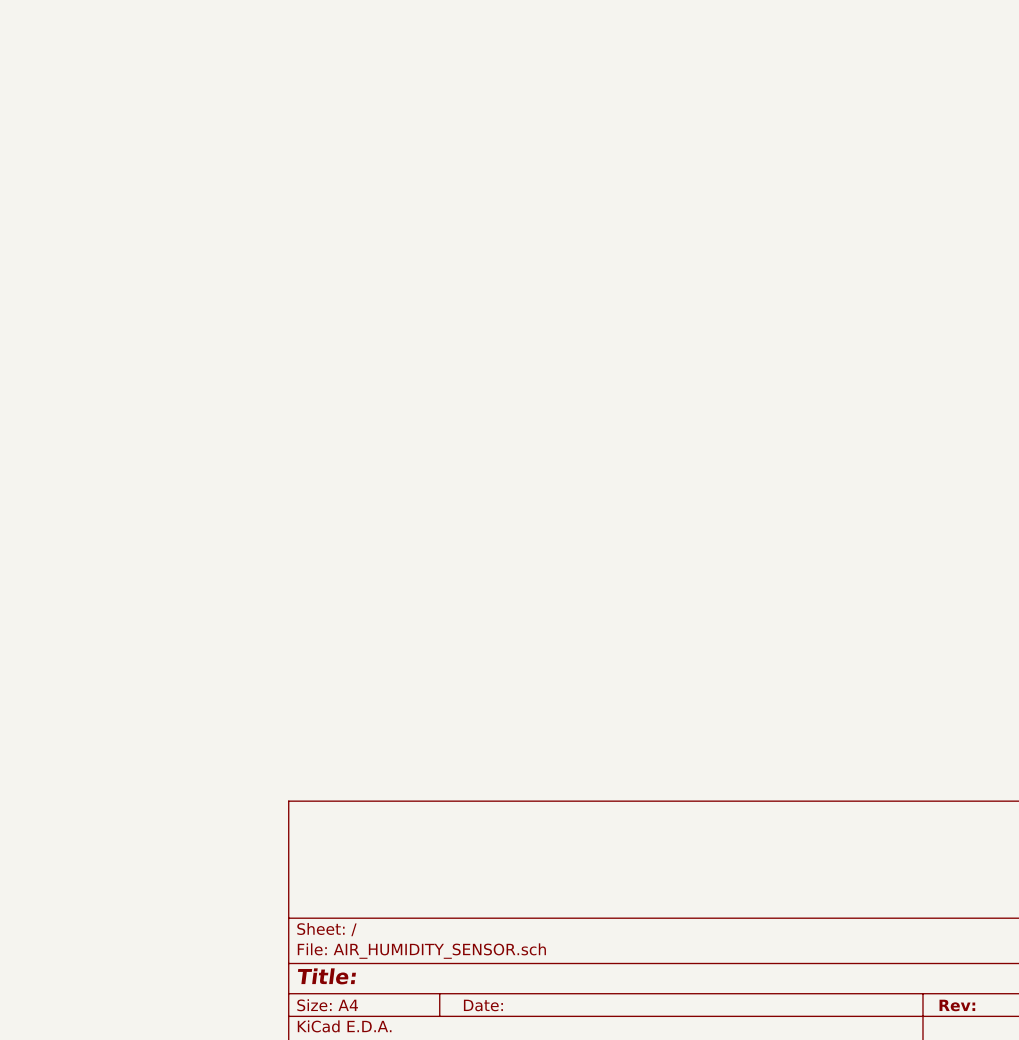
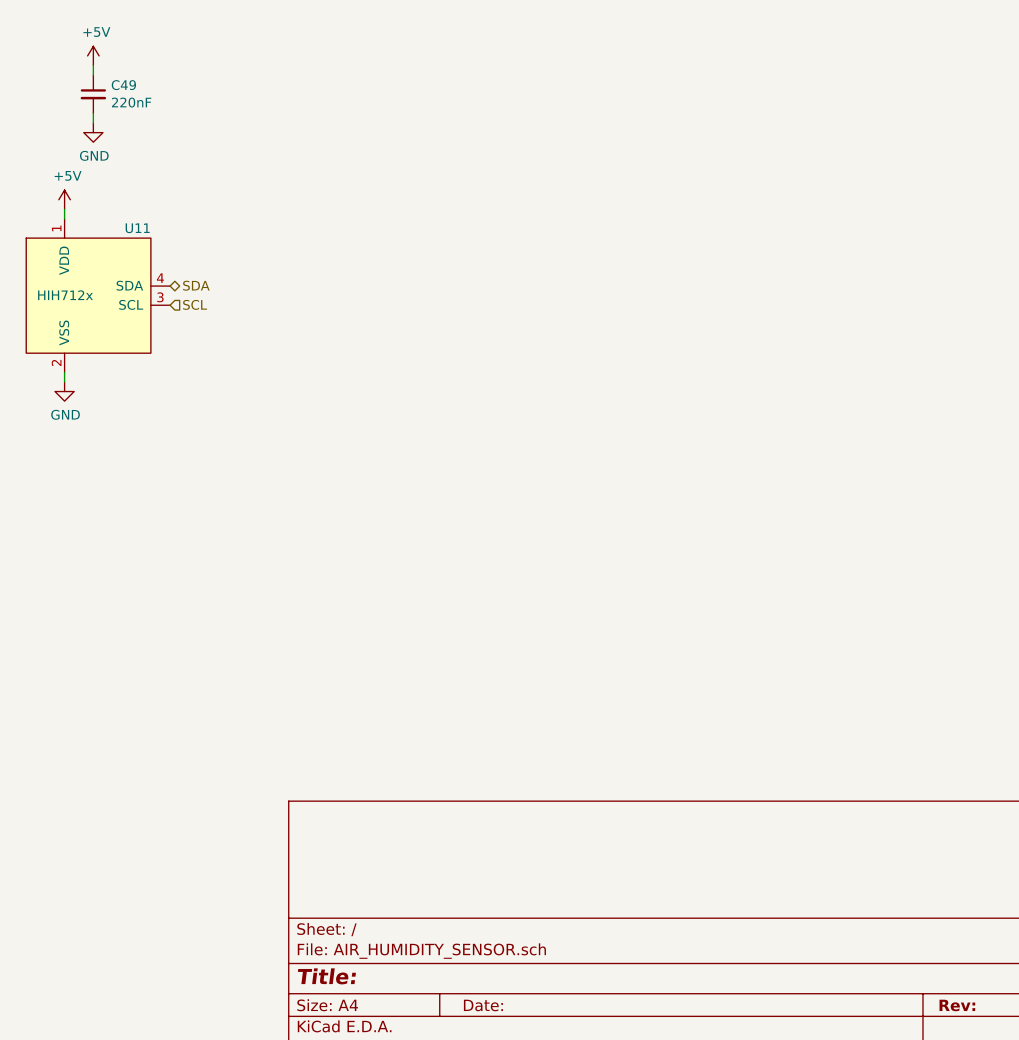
power symbol: none -> +5V (93, 55)
wire: none -> (93, 65) (93, 75)
C49: none -> 220nF (93, 94)
wire: none -> (93, 113) (93, 123)
power symbol: none -> GND (93, 132)
power symbol: none -> +5V (64, 199)
wire: none -> (64, 209) (64, 218)
hierarchical label: none -> SDA (196, 285)
U11: none -> HIH712x (98, 295)
hierarchical label: none -> SCL (195, 304)
wire: none -> (64, 372) (64, 381)
power symbol: none -> GND (64, 391)

